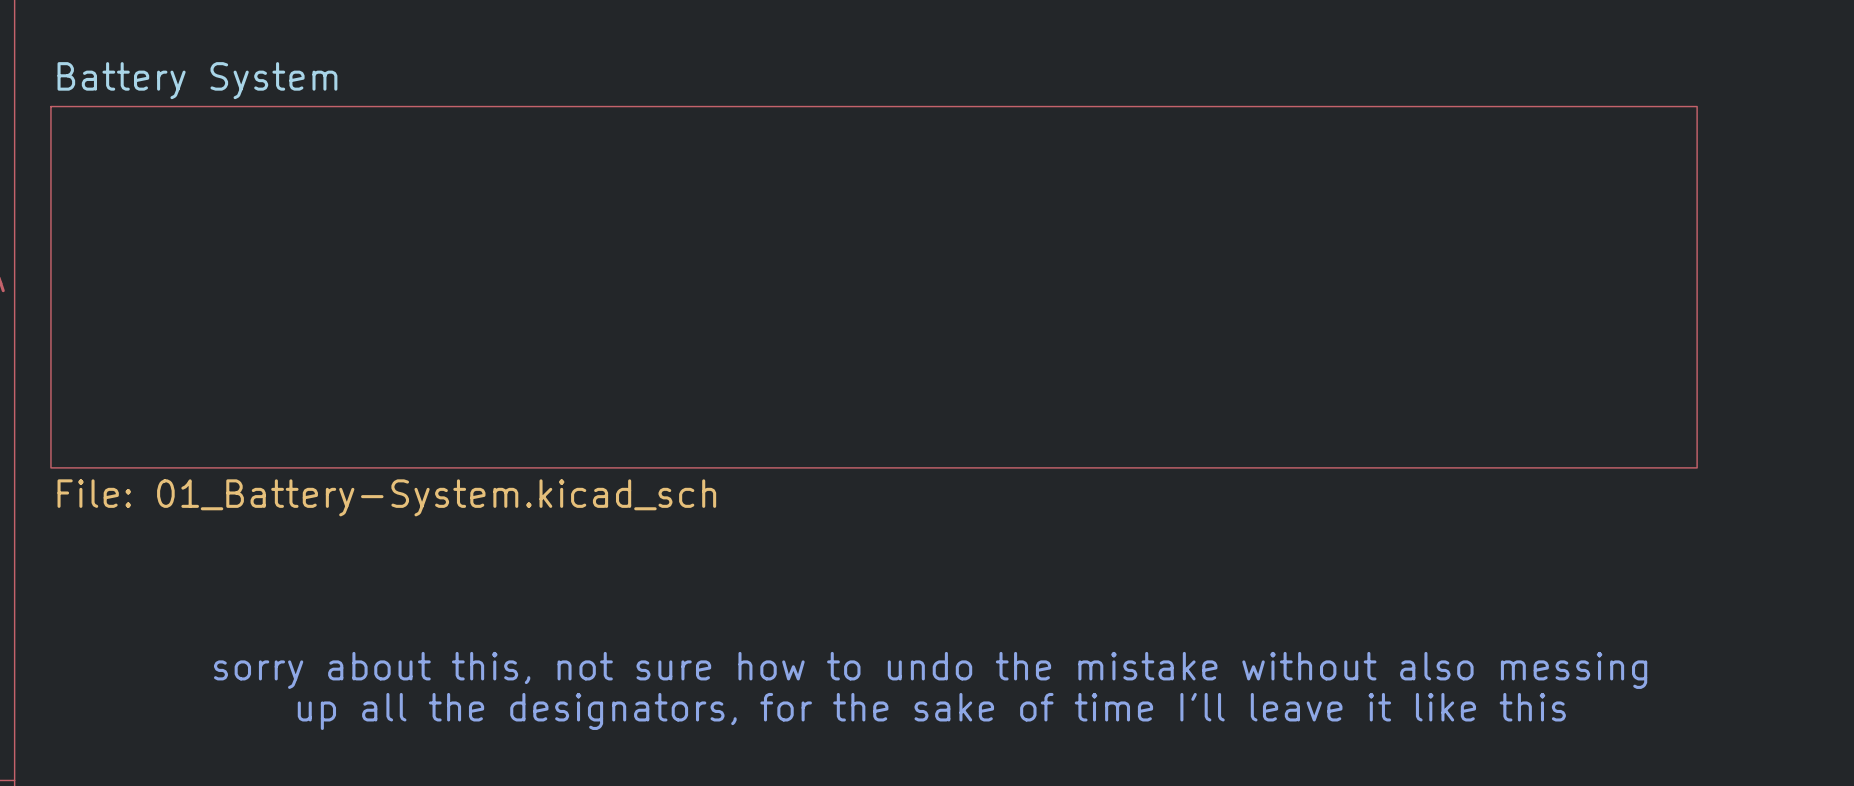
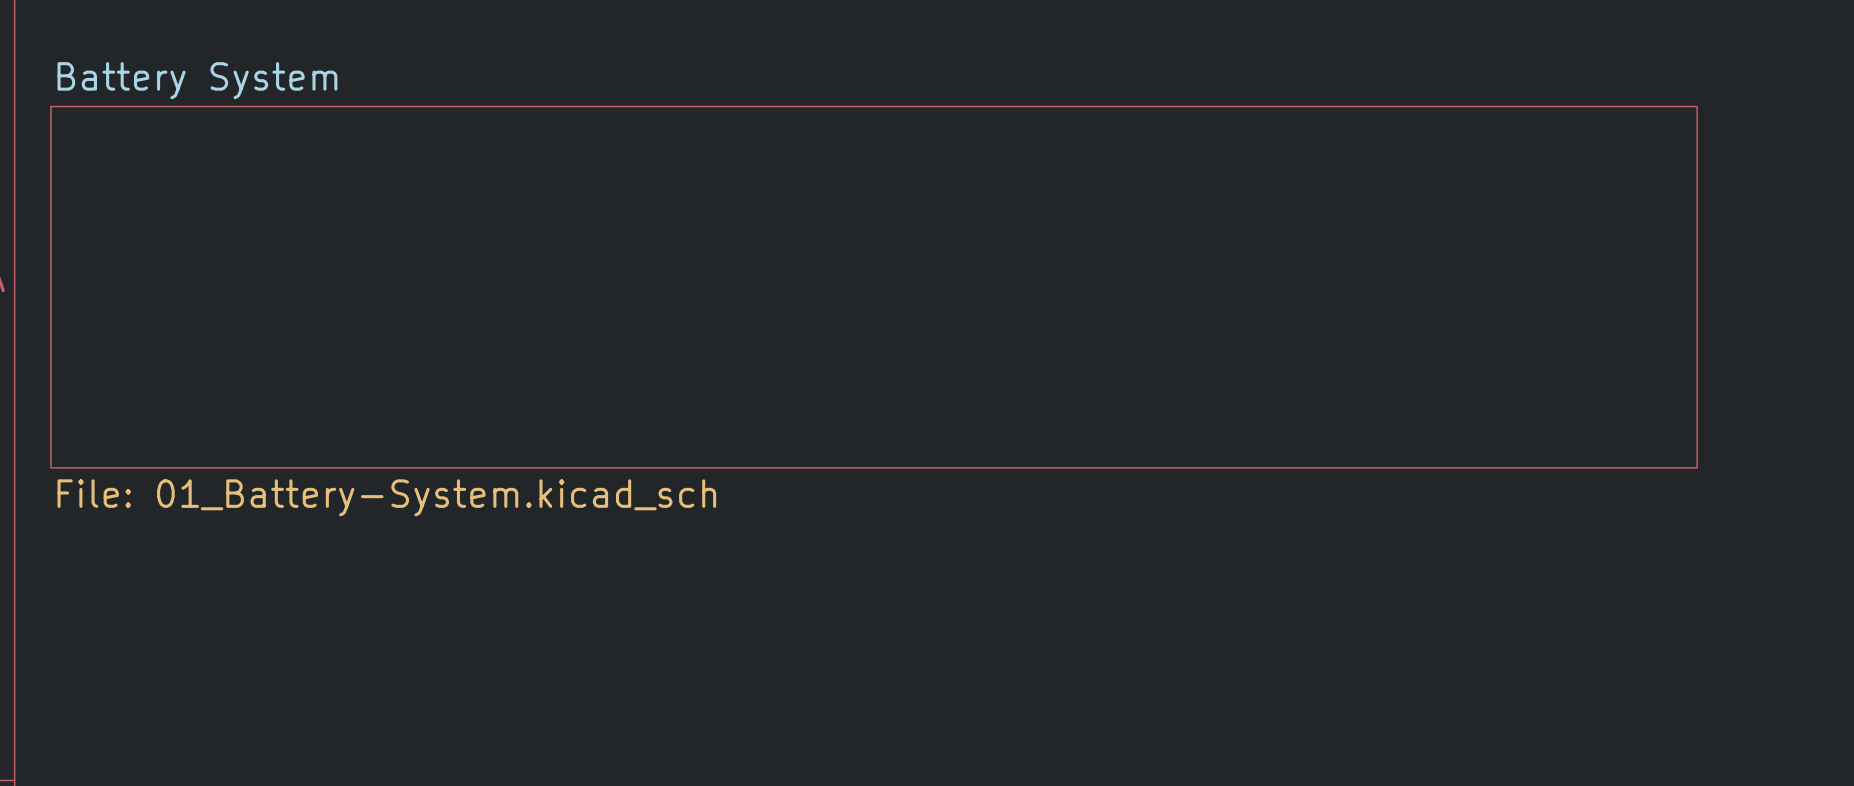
text: sorry about this, not sure how to undo the mistake without also messing (930, 670) -> none
text: up all the designators, for the sake of time I'll leave it like this (931, 711) -> none

